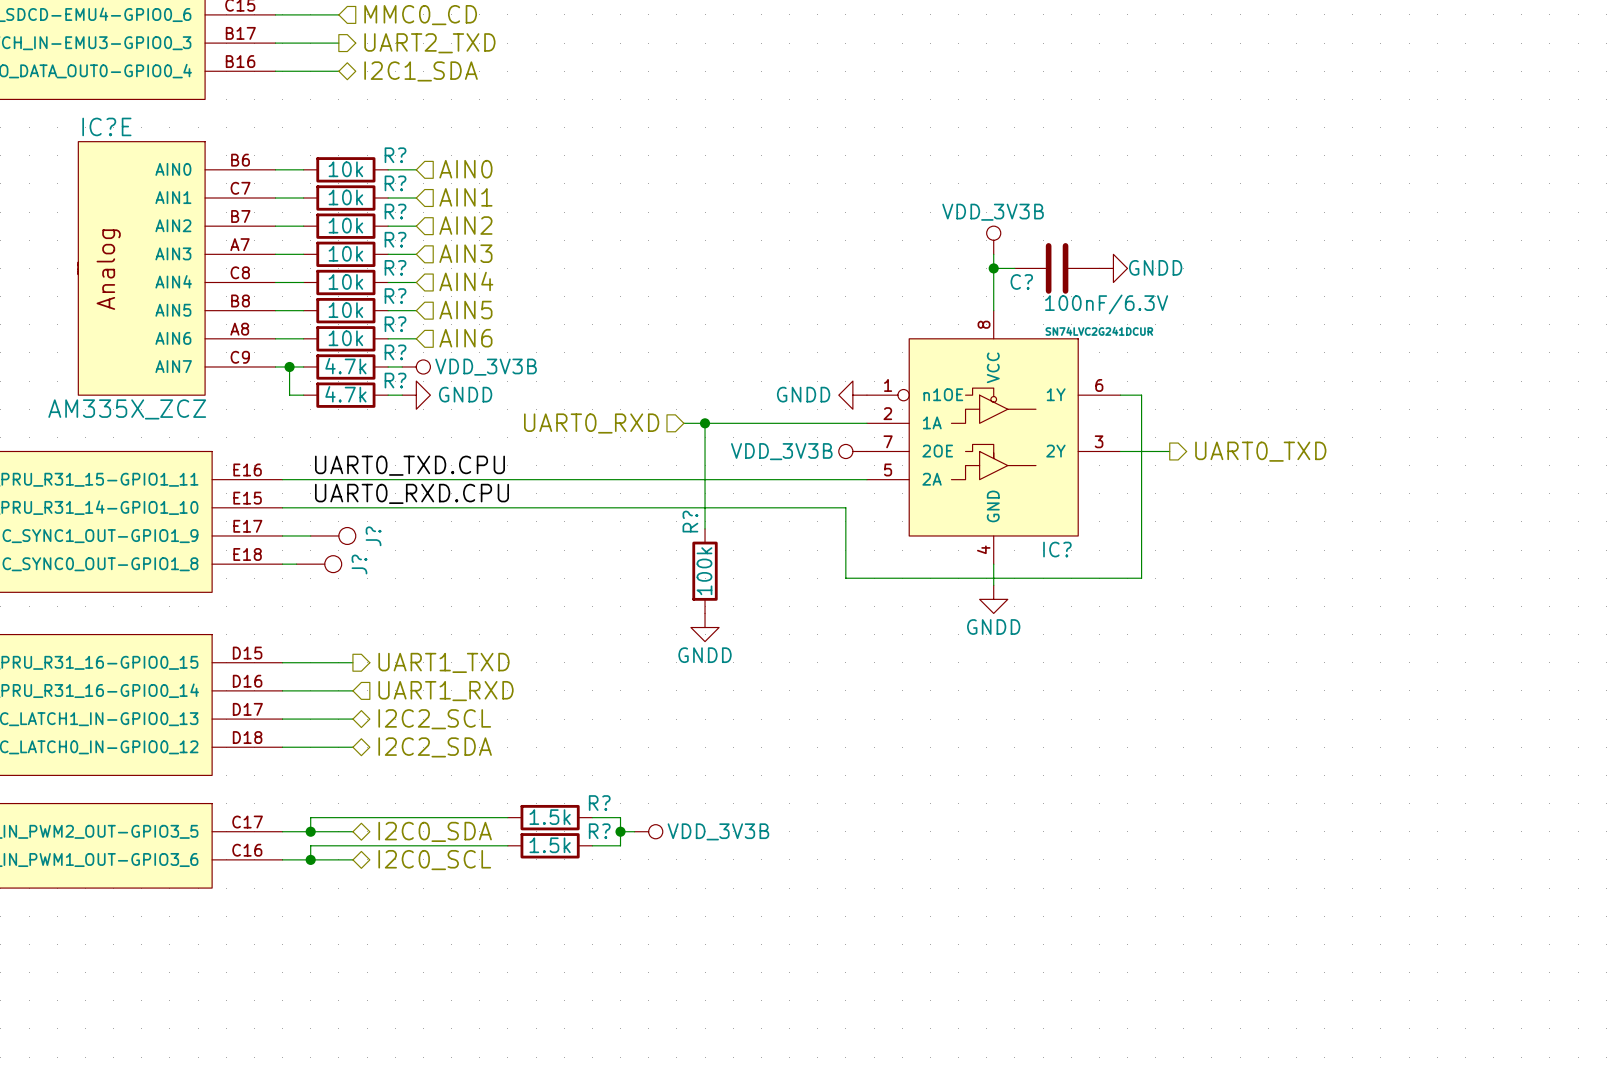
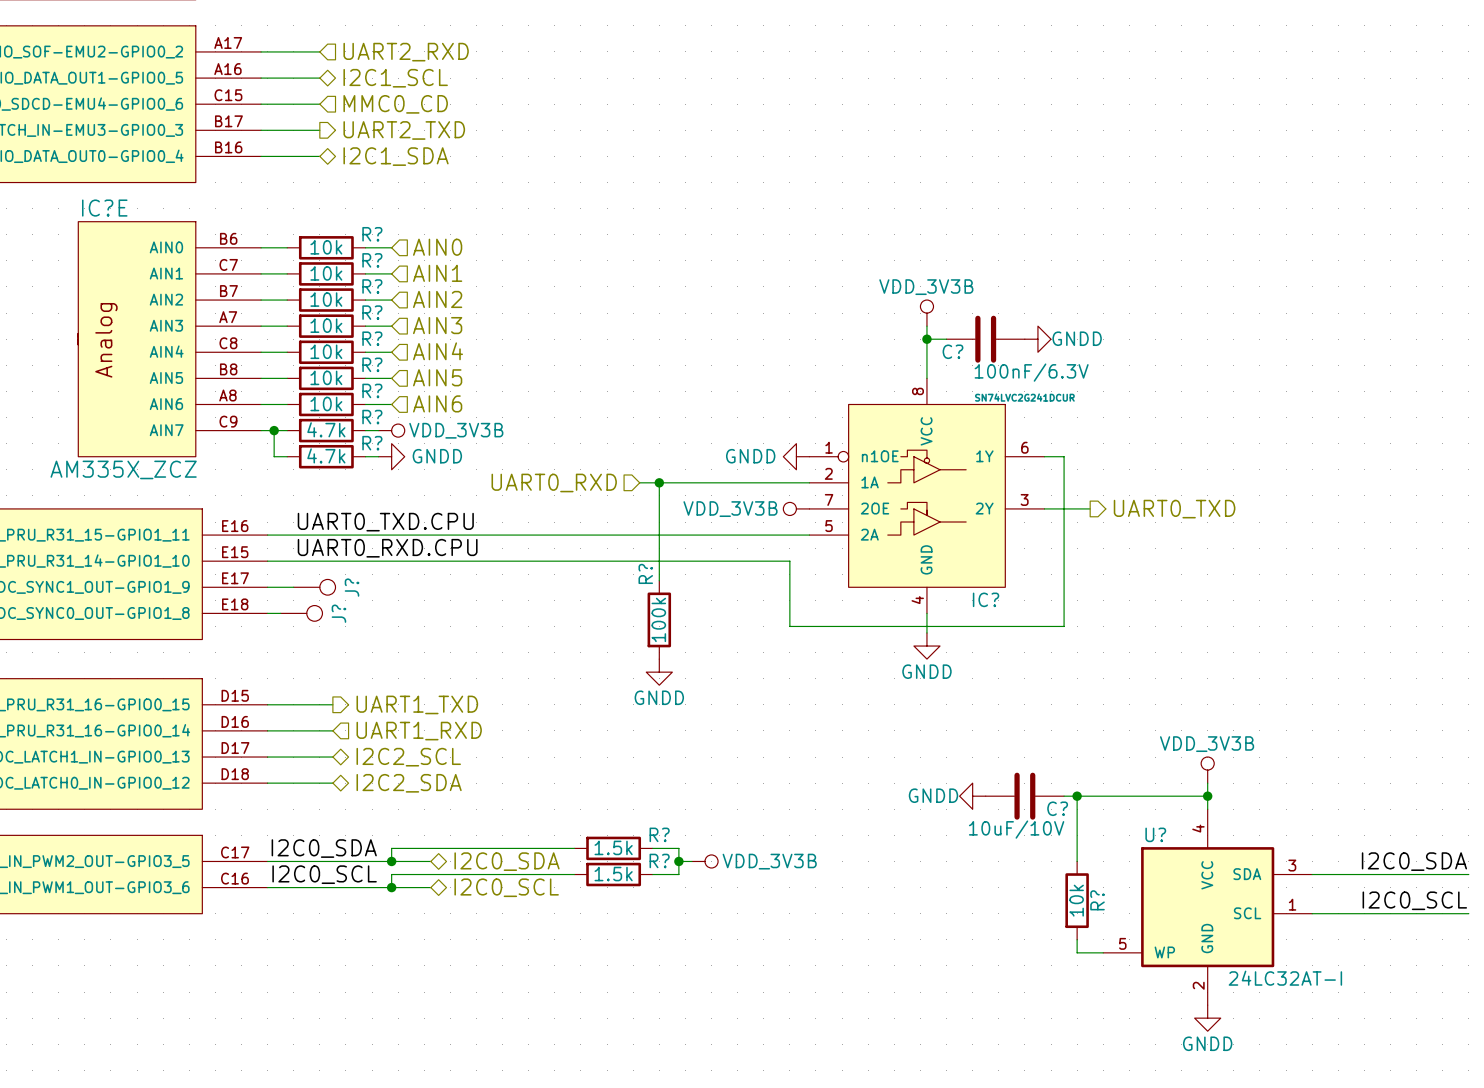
power symbol: none -> VDD_3V3B (1207, 770)
wire: none -> (1207, 783) (1207, 809)
power symbol: none -> GNDD (972, 796)
C?: none -> 10uF/10V (1024, 796)
wire: none -> (1064, 796) (1207, 796)
wire: none -> (1077, 796) (1077, 861)
junction: none -> (1077, 796)
junction: none -> (1207, 796)
label: none -> I2C0_SDA (324, 848)
wire: (416, 817) (310, 817) (310, 831) -> (391, 848) (391, 861)
wire: none -> (476, 848) (554, 848)
R?: 1.5k (550, 817) -> none
wire: (613, 817) (620, 817) (620, 845) (613, 845) -> none
R?: none -> 1.5k (613, 848)
wire: none -> (652, 848) (678, 848) (678, 874) (652, 874)
junction: (310, 831) -> none
wire: none -> (332, 861) (430, 861)
junction: none -> (391, 861)
hierarchical label position: I2C0_SDA (435, 831) -> I2C0_SDA (507, 861)
wire: (620, 831) (634, 831) -> (678, 861) (691, 861)
junction: (620, 831) -> none
power symbol position: VDD_3V3B (648, 831) -> VDD_3V3B (705, 861)
junction: none -> (678, 861)
label: none -> I2C0_SDA (1414, 861)
label: none -> I2C0_SCL (324, 874)
wire: (416, 845) (310, 845) (310, 859) -> (391, 874) (391, 887)
wire: none -> (476, 874) (554, 874)
R?: 1.5k (550, 845) -> none
R?: none -> 1.5k (613, 874)
wire: none -> (1312, 874) (1468, 874)
junction: (310, 859) -> none
wire: none -> (332, 887) (430, 887)
junction: none -> (391, 887)
hierarchical label position: I2C0_SCL (434, 860) -> I2C0_SCL (506, 887)
R?: none -> 10k (1077, 900)
label: none -> I2C0_SCL (1414, 900)
U?: none -> 24LC32AT-I (1207, 907)
wire: none -> (1312, 913) (1468, 913)
wire: none -> (1077, 939) (1077, 952) (1103, 952)
power symbol: none -> GNDD (1207, 1018)

